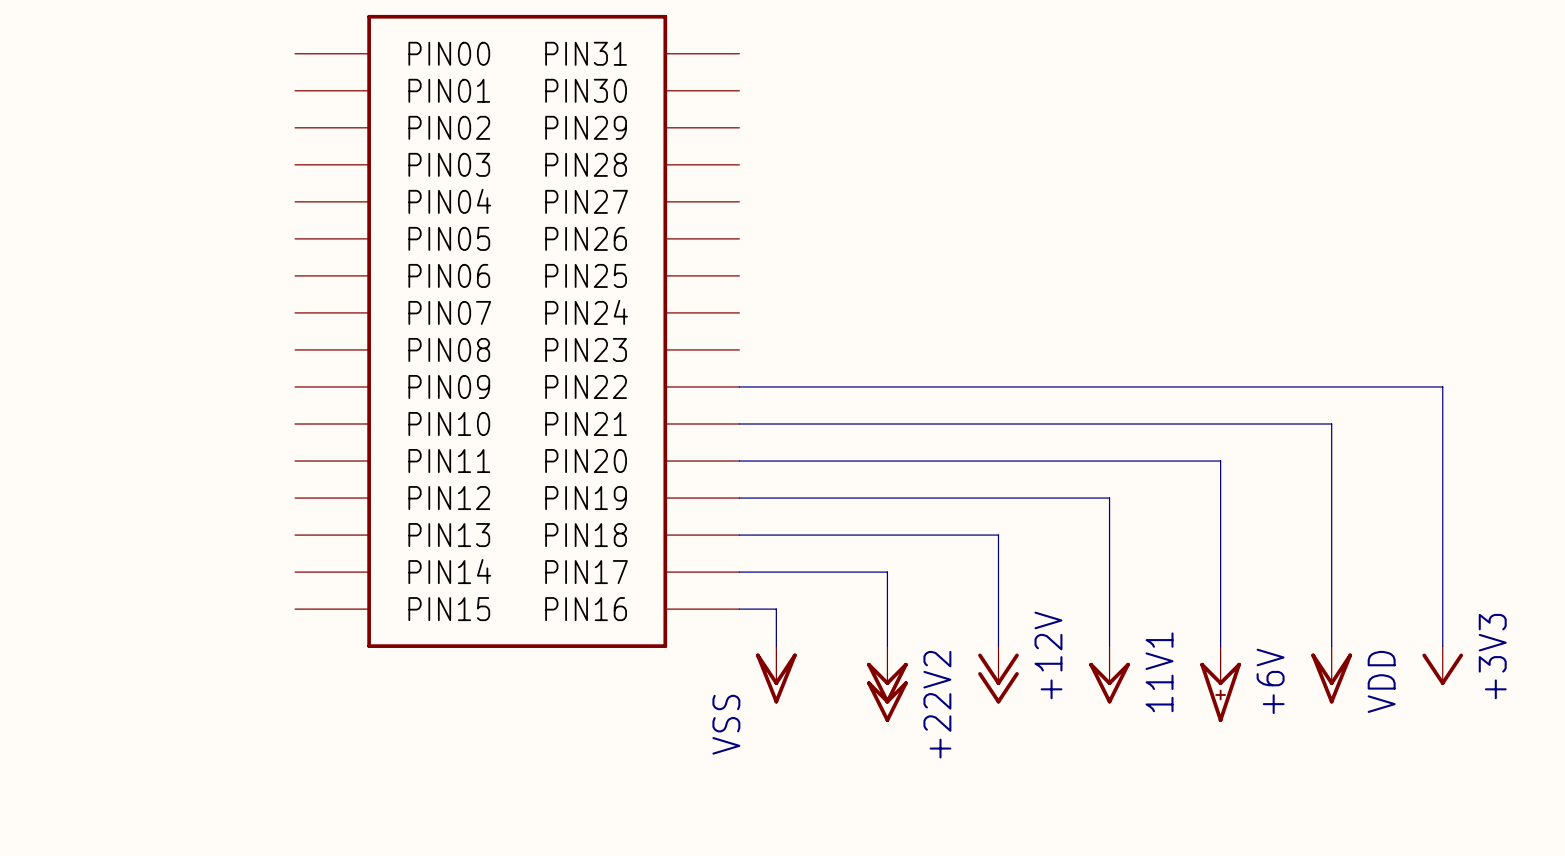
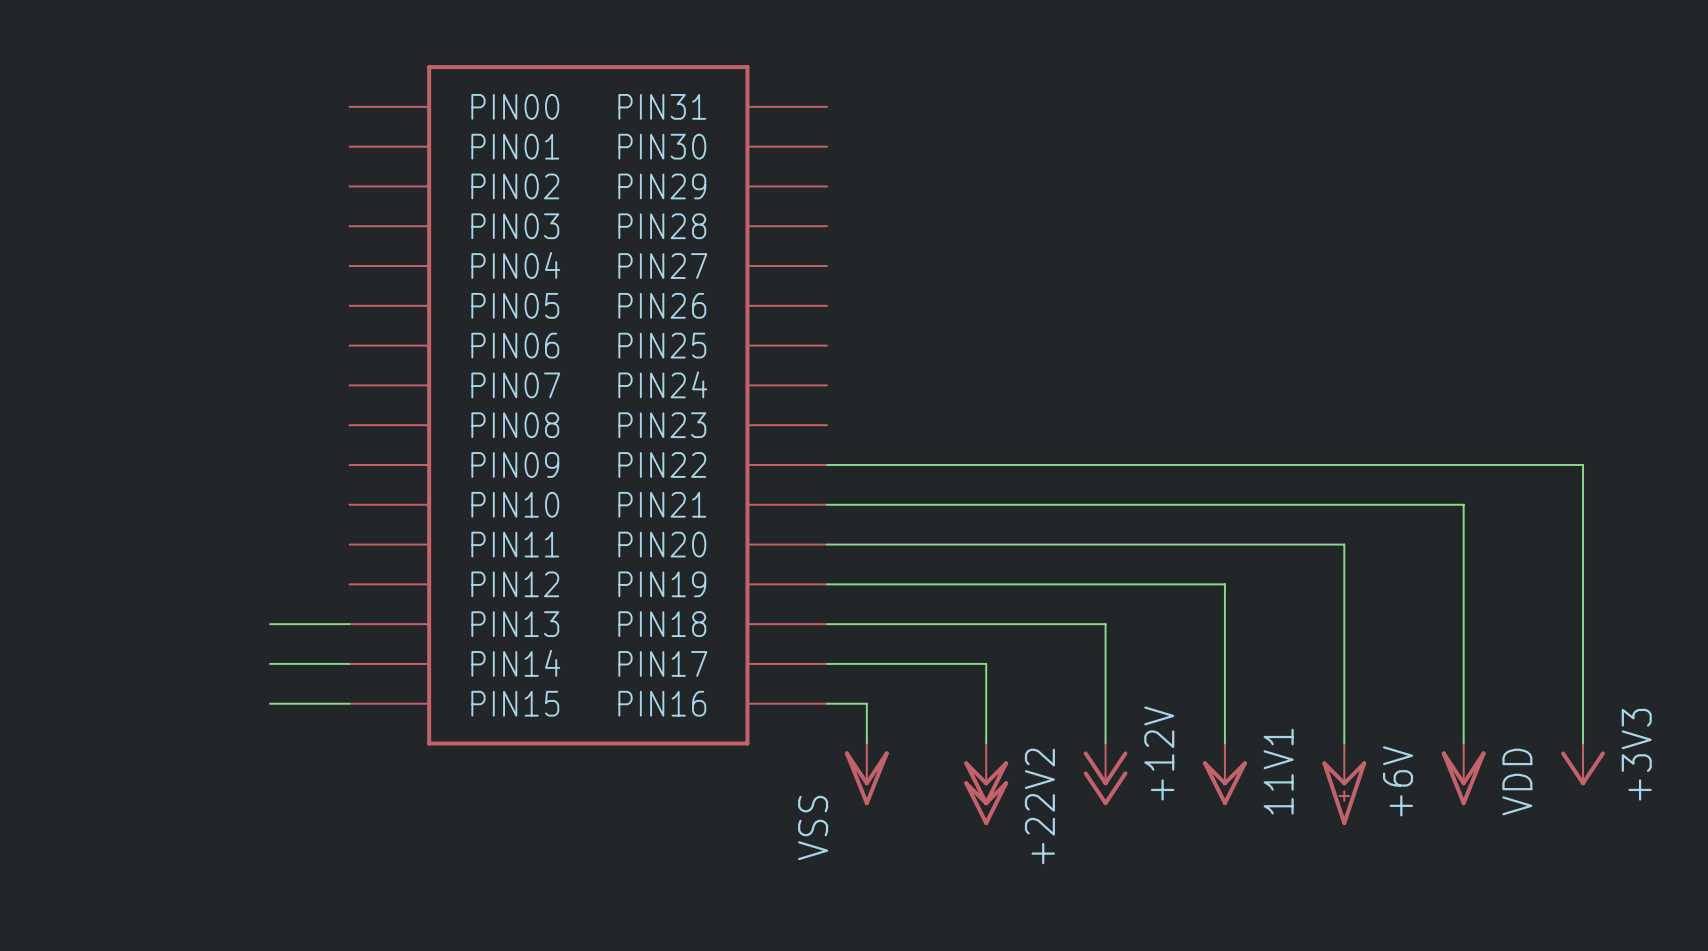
wire: none -> (269, 624) (349, 624)
wire: none -> (269, 663) (349, 663)
wire: none -> (269, 703) (349, 703)

